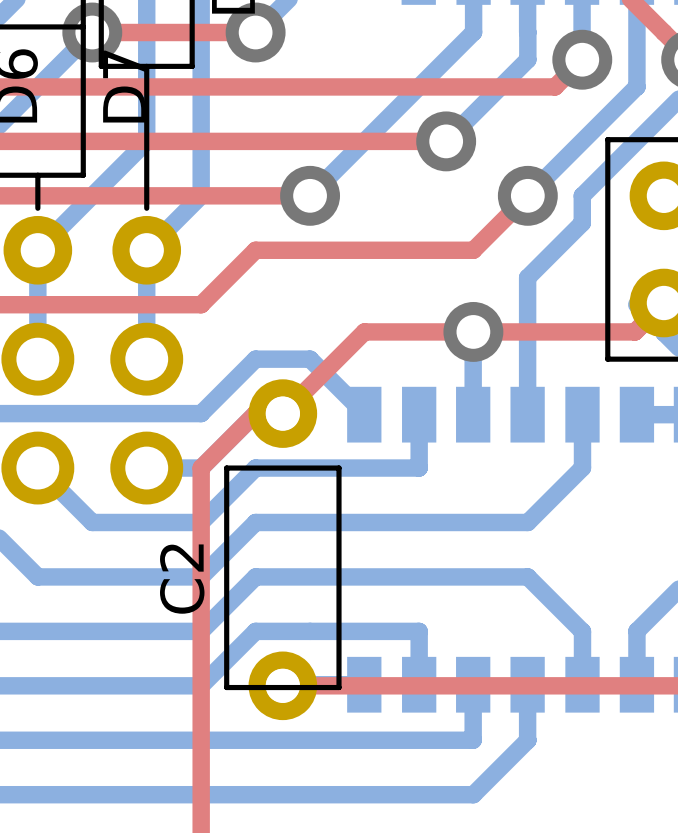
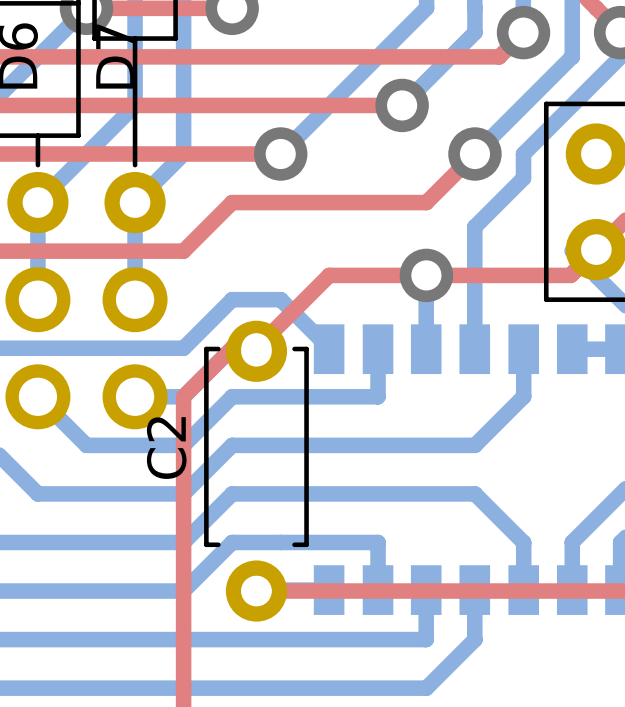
C2 footprint: [224, 379, 342, 721] -> [204, 320, 309, 622]

